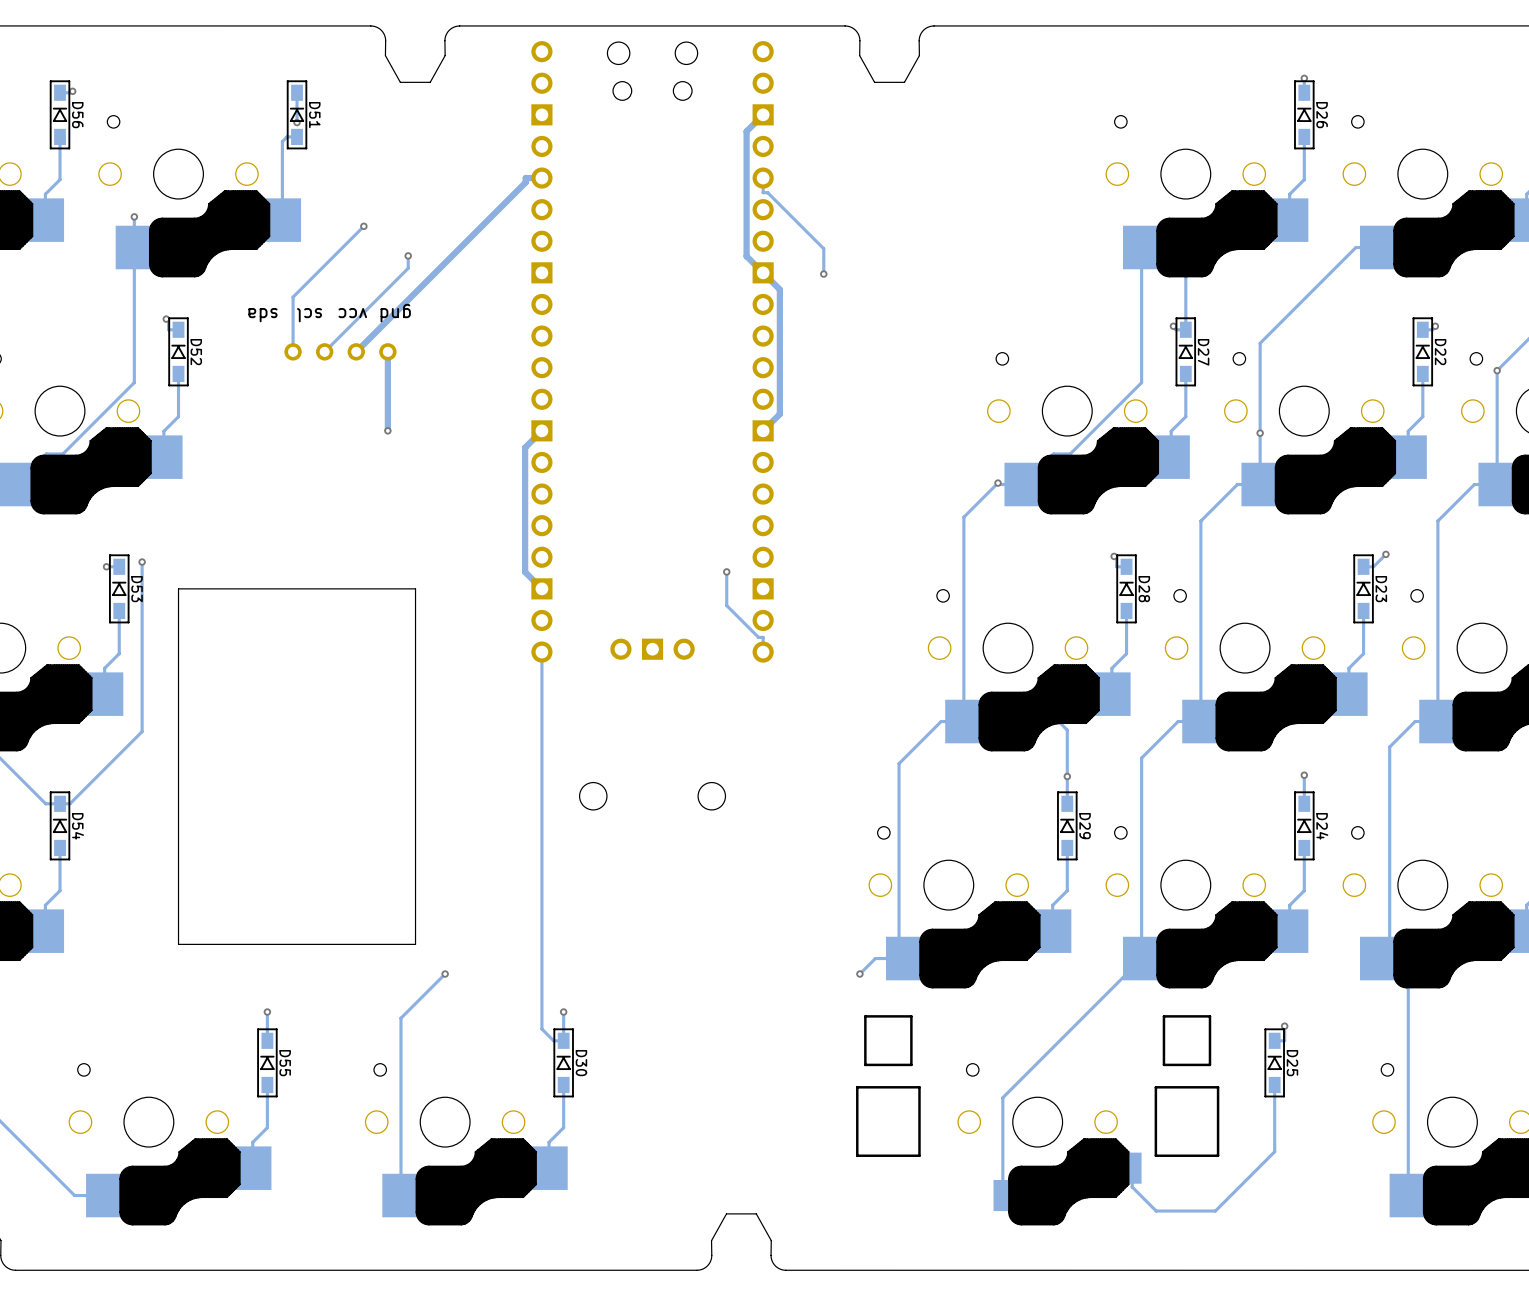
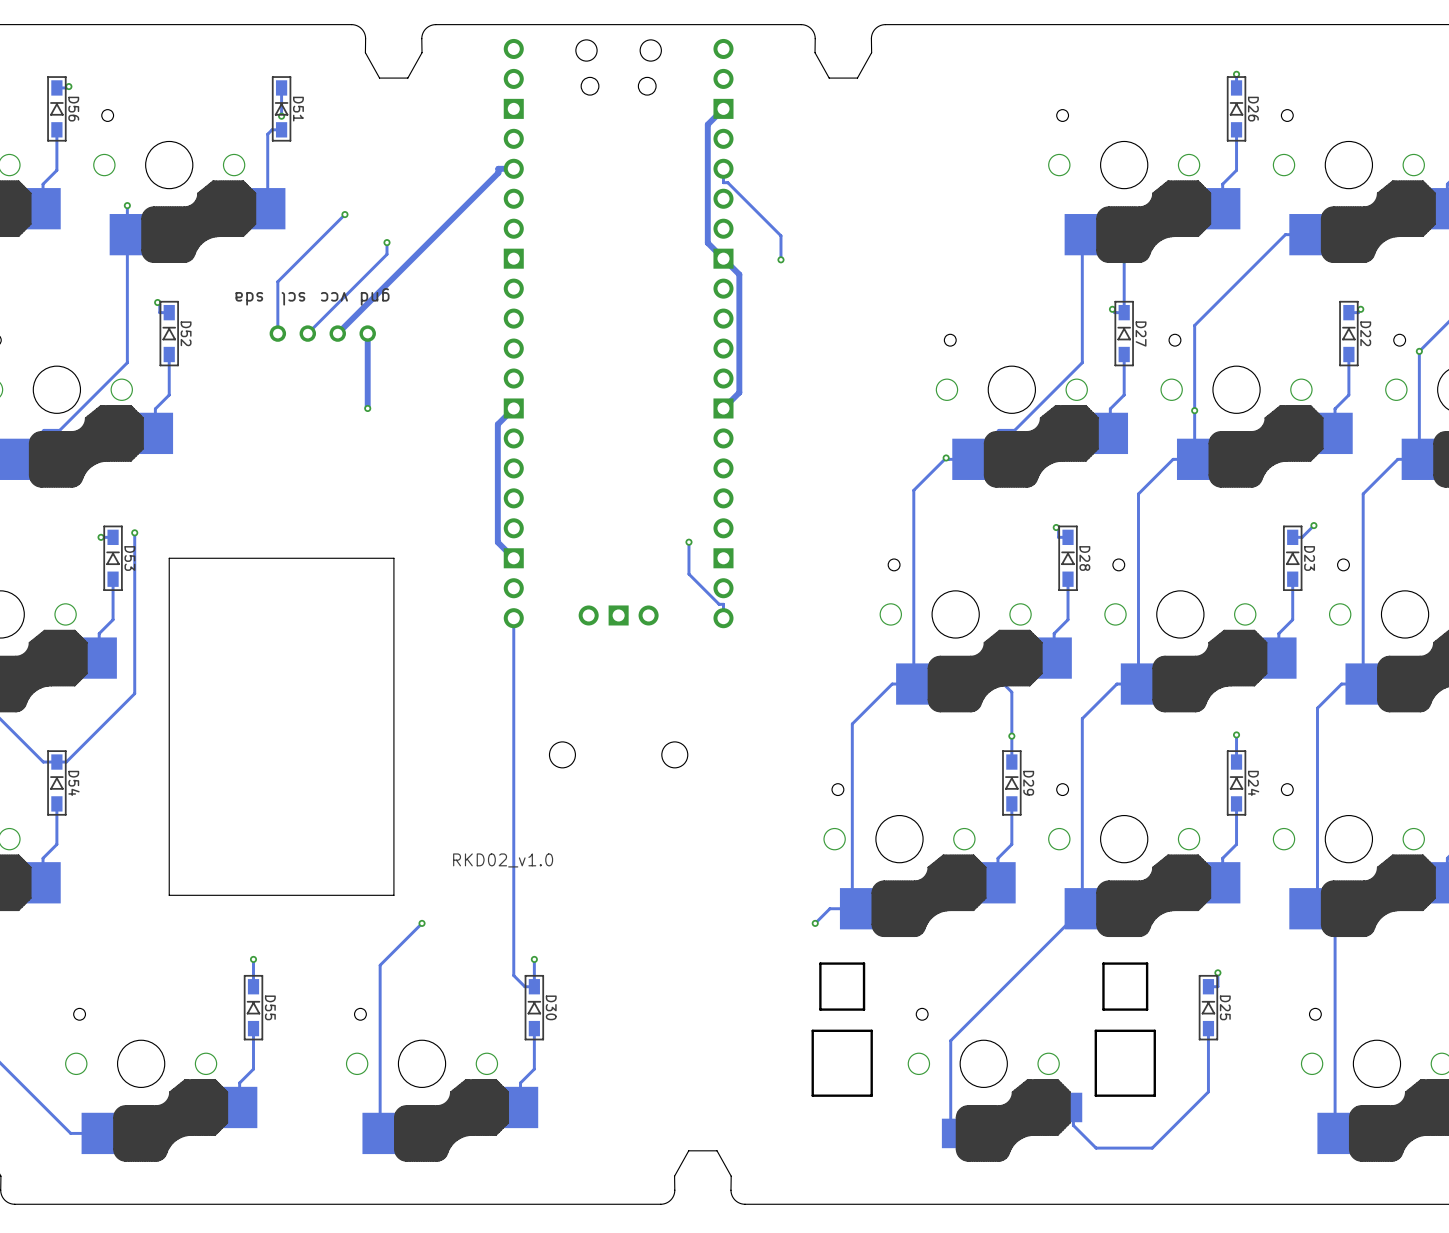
text: none -> RKD02_v1.0 (503, 860)

